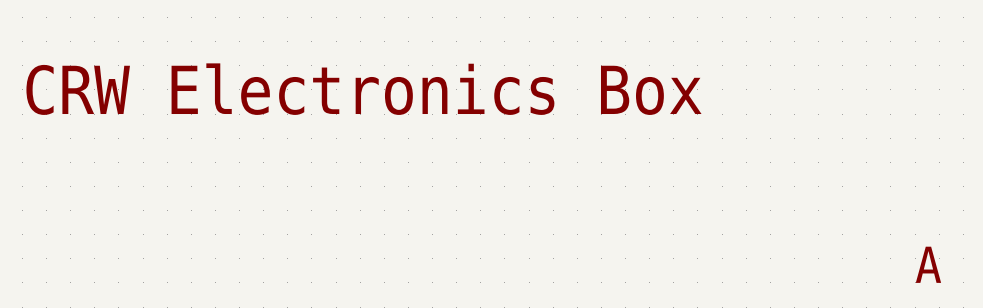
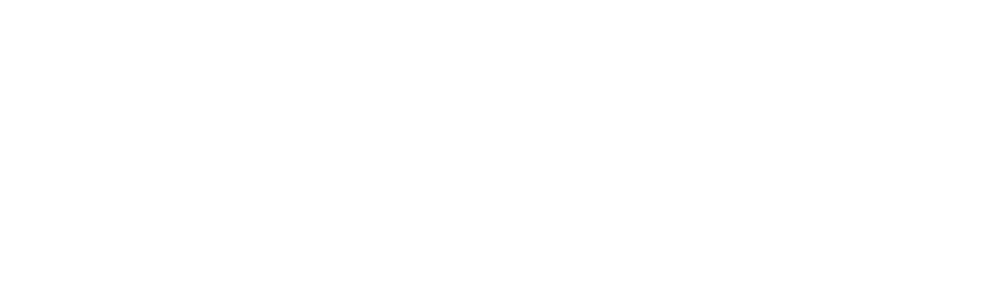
text: CRW Electronics Box (363, 89) -> none
text: A (928, 264) -> none

